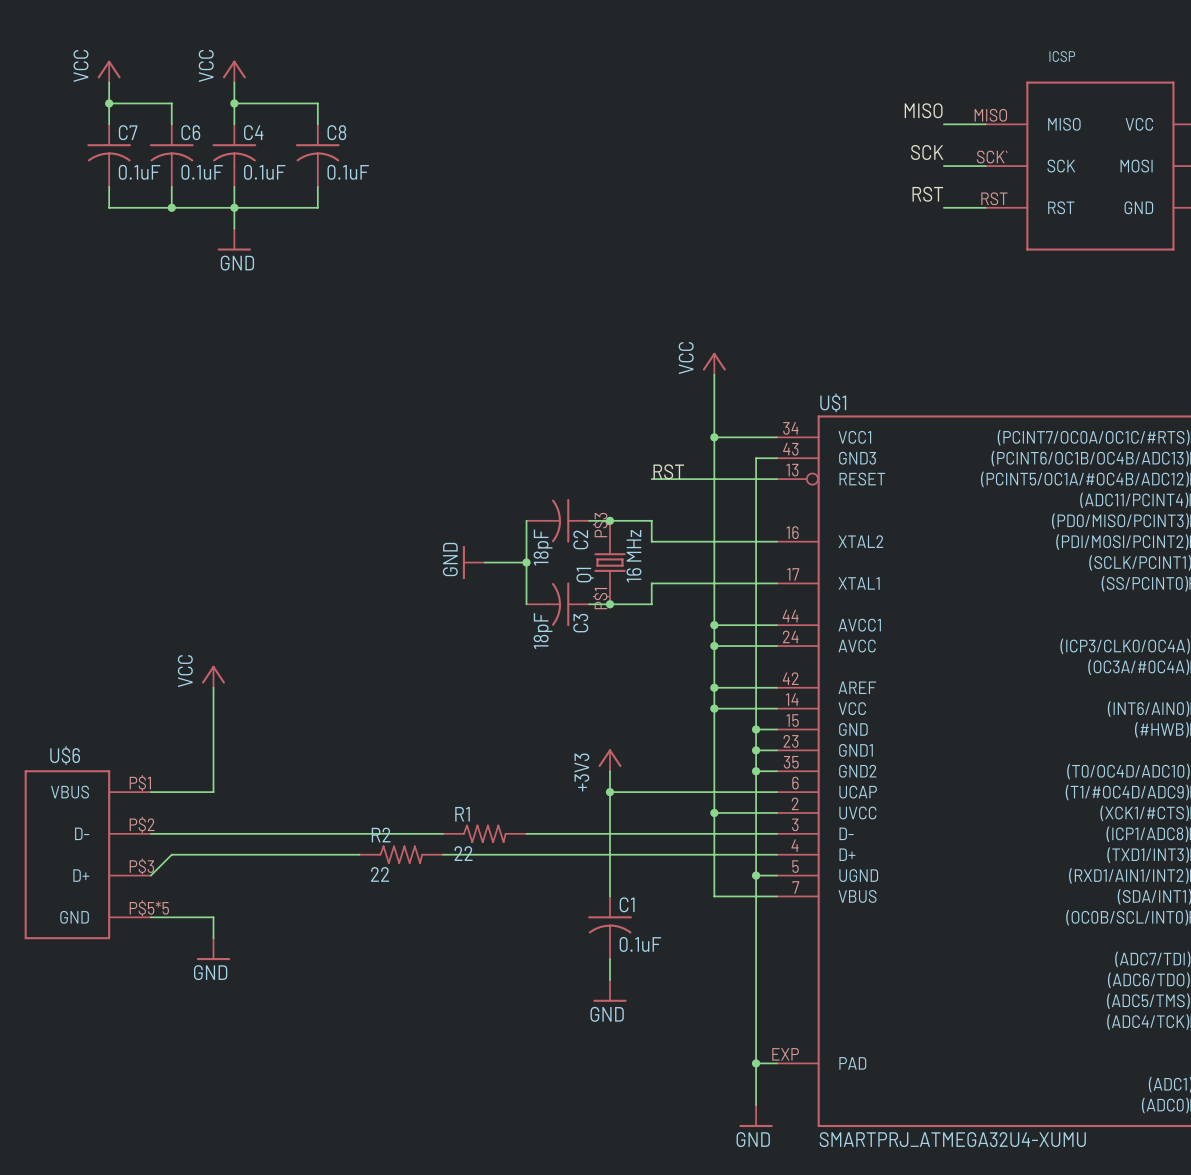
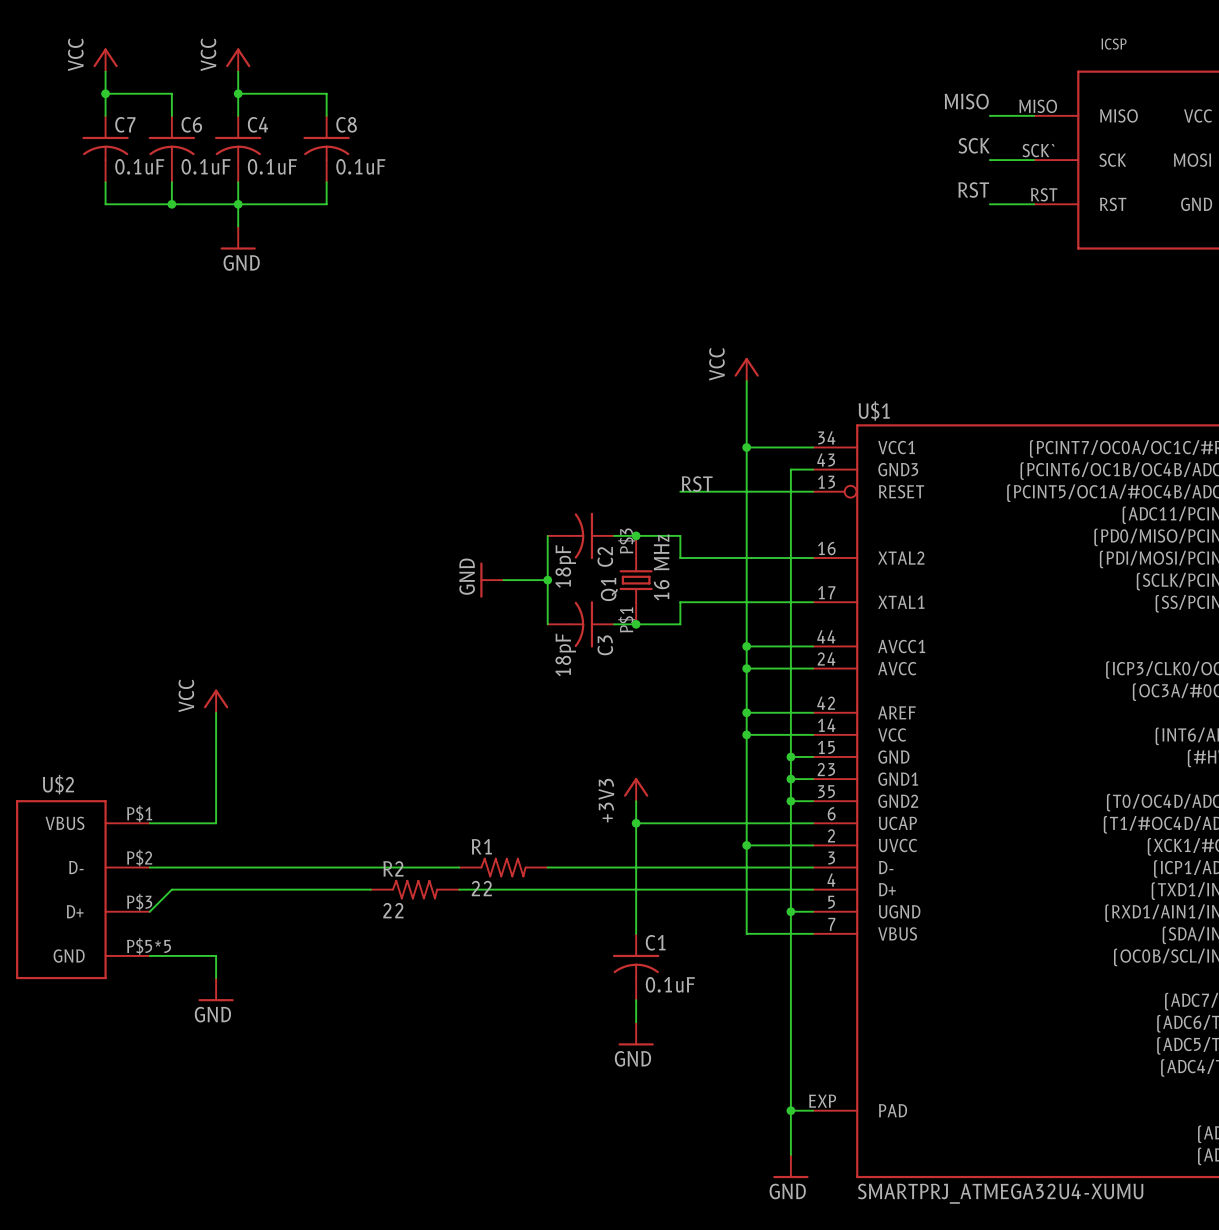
U$6 name: U$6 (65, 755) -> U$2 (58, 784)

